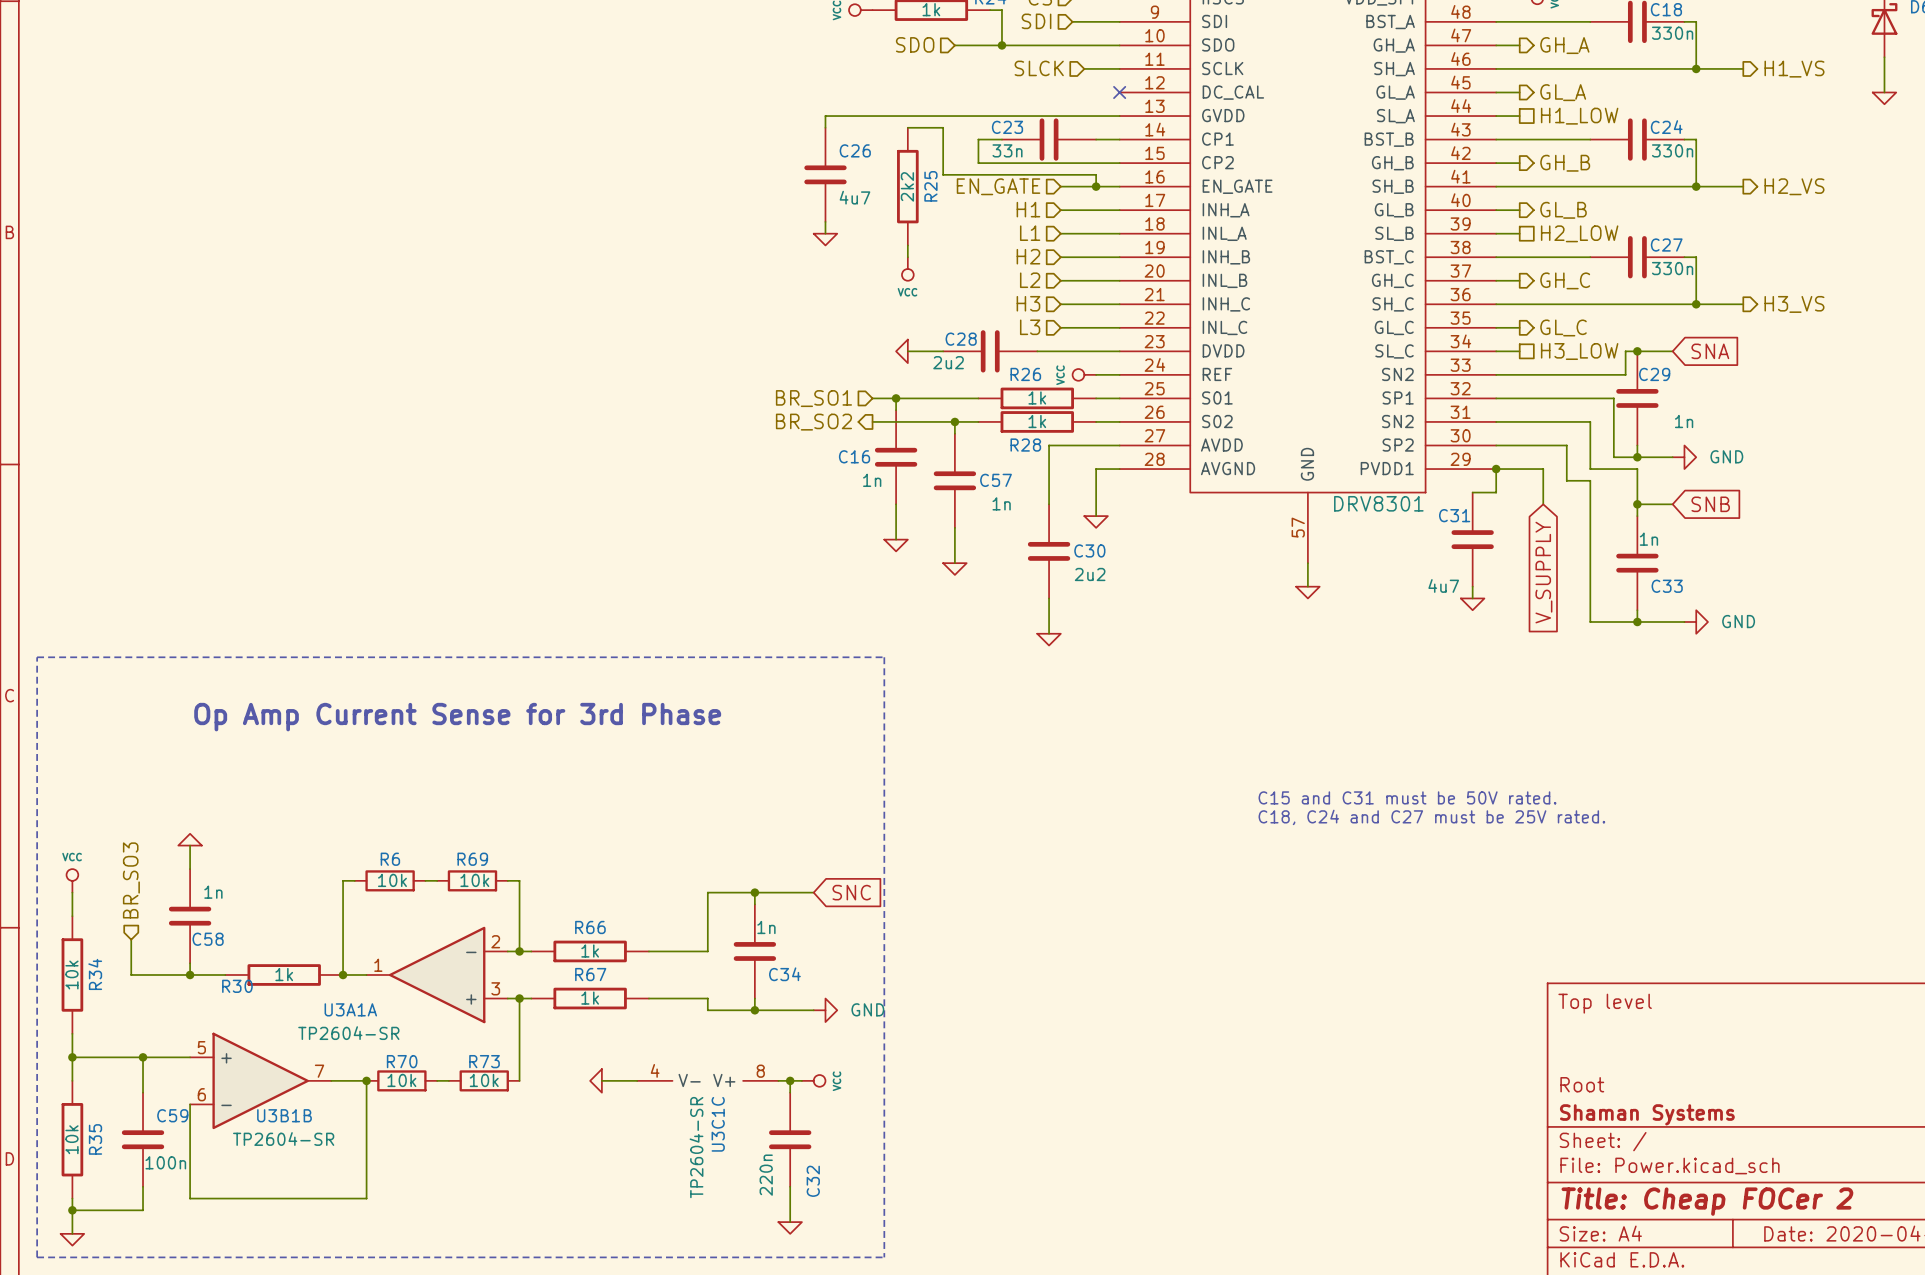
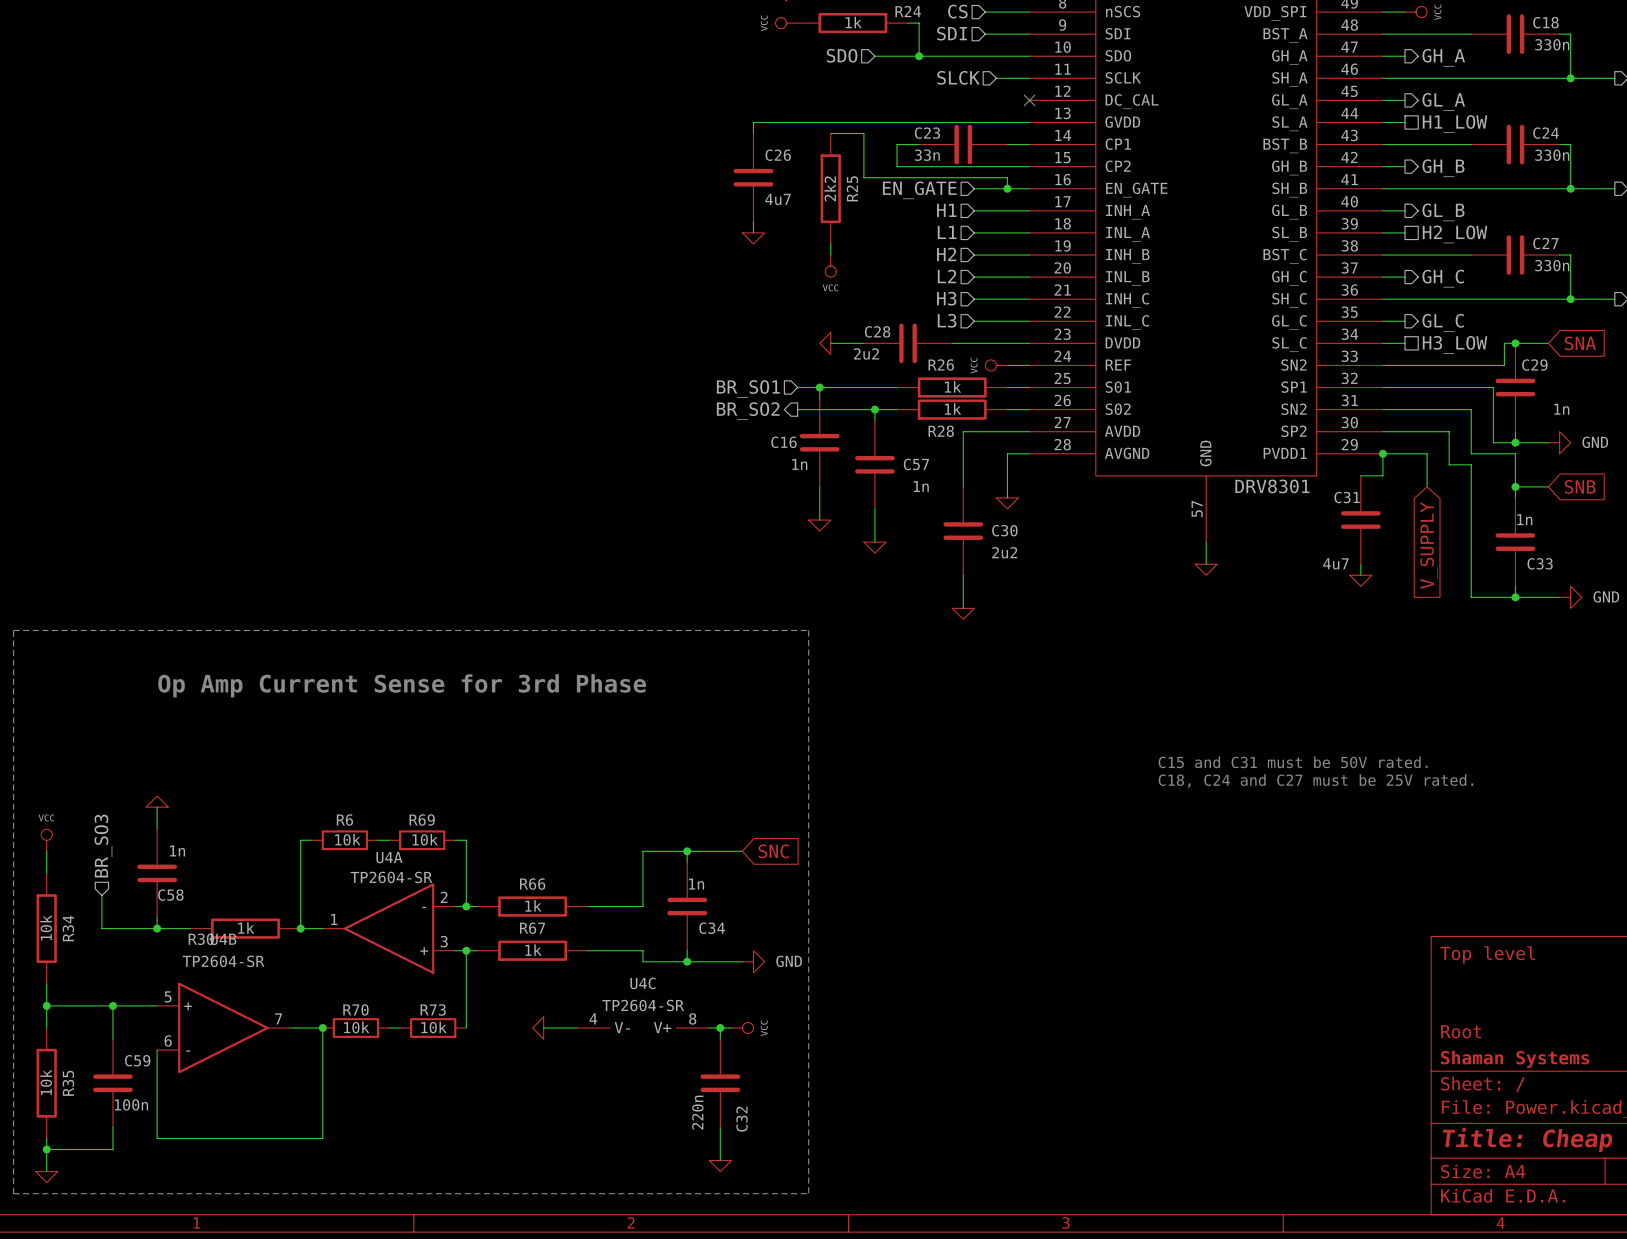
U3A1A name: U3A1A (350, 1009) -> U4A (389, 857)
U3A1A value position: TP2604-SR (348, 1033) -> TP2604-SR (391, 877)
U3B1B name: U3B1B (284, 1115) -> U4B (223, 939)
U3C1C name: U3C1C (718, 1124) -> U4C (642, 983)
U3B1B value position: TP2604-SR (283, 1139) -> TP2604-SR (223, 961)
U3C1C value rotation: 0° (696, 1147) -> 90° clockwise (643, 1005)

